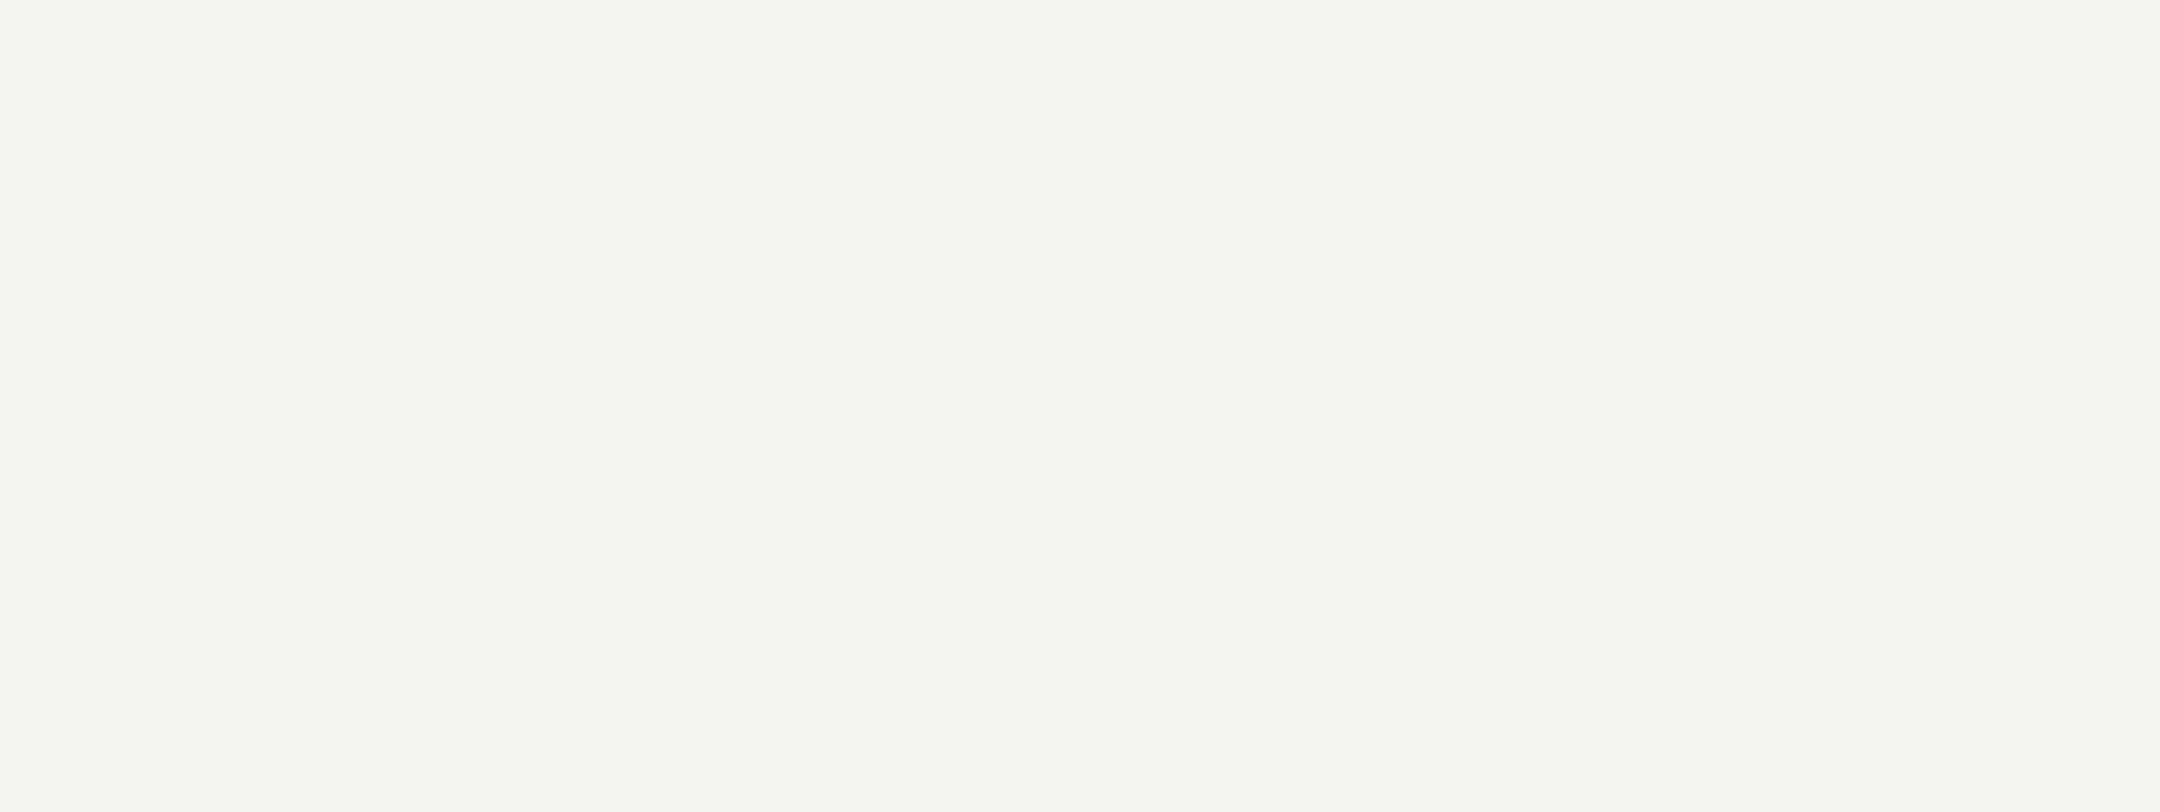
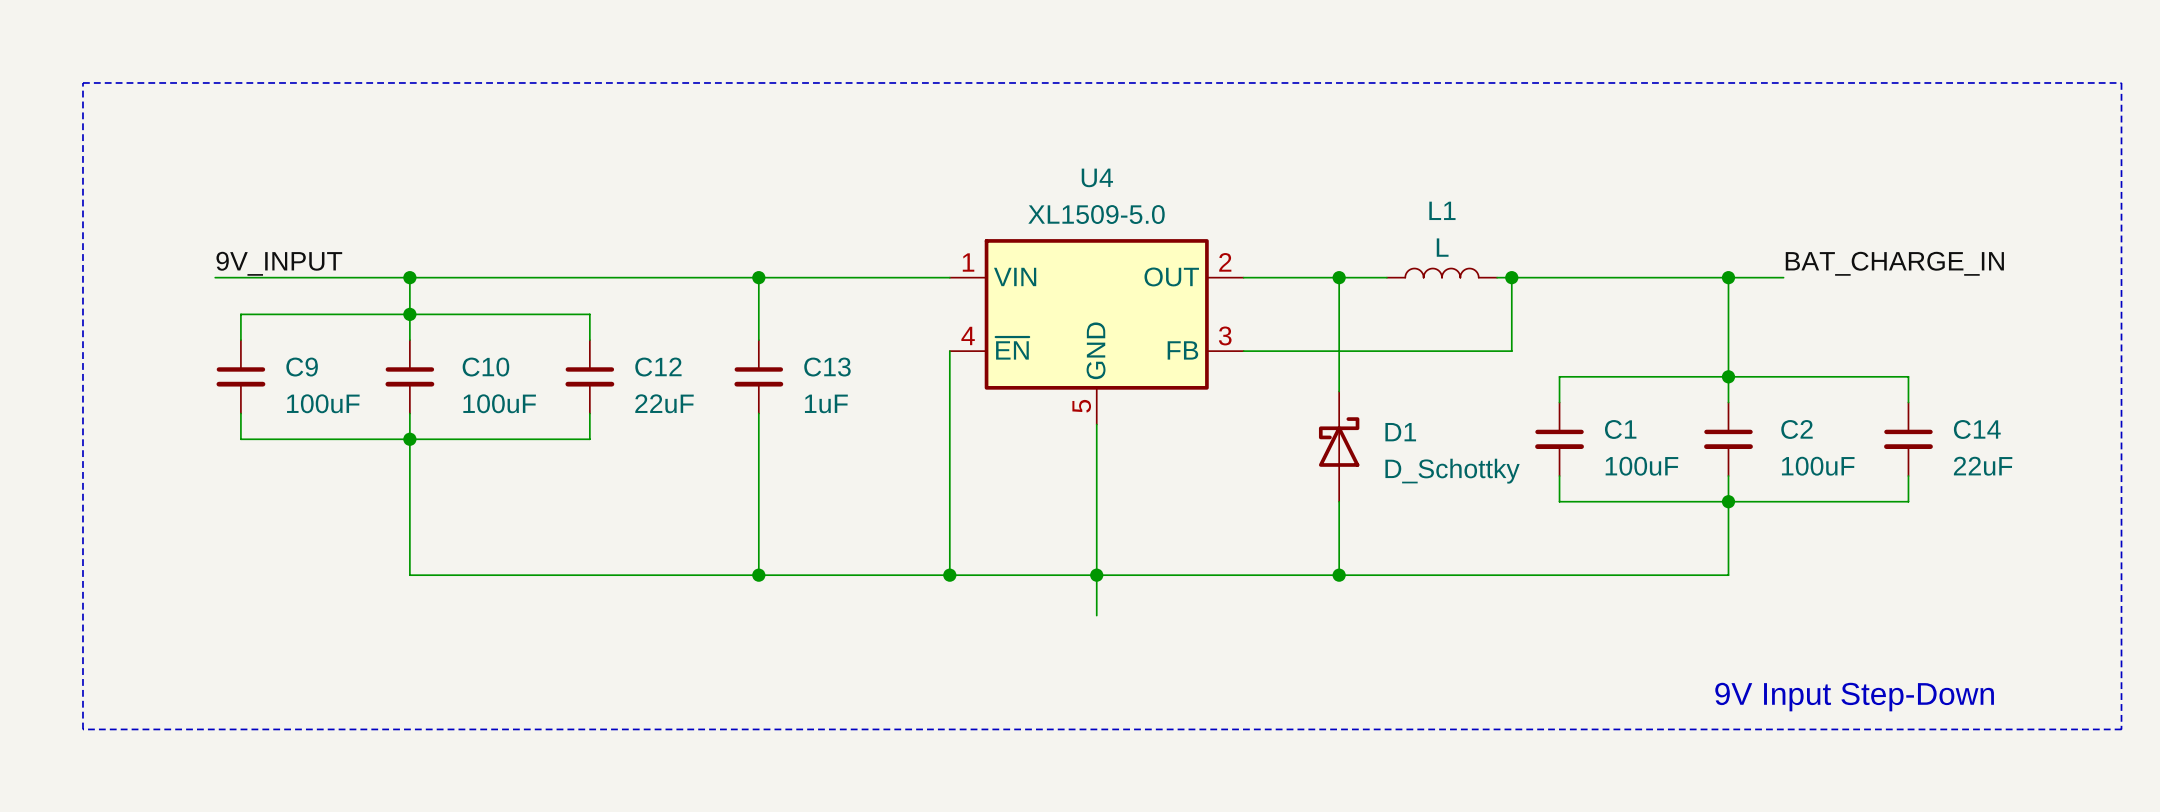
line: none -> (82, 82) (2121, 82) (2121, 729) (82, 729) (82, 82)
label: none -> 9V_INPUT (279, 263)
label: none -> BAT_CHARGE_IN (1894, 263)
L1: none -> L (1442, 273)
wire: none -> (215, 277) (949, 277)
wire: none -> (409, 277) (409, 340)
junction: none -> (409, 277)
wire: none -> (758, 277) (758, 340)
junction: none -> (758, 277)
wire: none -> (1243, 277) (1386, 277)
wire: none -> (1339, 277) (1339, 391)
junction: none -> (1339, 277)
wire: none -> (1497, 277) (1783, 277)
wire: none -> (1511, 277) (1511, 351) (1243, 351)
junction: none -> (1511, 277)
wire: none -> (1728, 277) (1728, 402)
junction: none -> (1728, 277)
junction: none -> (409, 314)
U4: none -> XL1509-5.0 (1096, 331)
wire: none -> (240, 340) (240, 314) (589, 314) (589, 340)
wire: none -> (949, 351) (949, 575)
C9: none -> 100uF (240, 376)
C10: none -> 100uF (409, 376)
C12: none -> 22uF (589, 376)
C13: none -> 1uF (758, 376)
junction: none -> (1728, 376)
wire: none -> (1559, 402) (1559, 376) (1908, 376) (1908, 402)
wire: none -> (240, 413) (240, 439) (589, 439) (589, 413)
wire: none -> (409, 413) (409, 575) (1728, 575) (1728, 476)
wire: none -> (758, 413) (758, 575)
wire: none -> (1096, 424) (1096, 615)
junction: none -> (409, 439)
C1: none -> 100uF (1559, 439)
C2: none -> 100uF (1728, 439)
C14: none -> 22uF (1908, 439)
D1: none -> D_Schottky (1339, 446)
wire: none -> (1559, 476) (1559, 501) (1908, 501) (1908, 476)
wire: none -> (1339, 501) (1339, 575)
junction: none -> (1728, 501)
junction: none -> (758, 575)
junction: none -> (949, 575)
junction: none -> (1096, 575)
junction: none -> (1339, 575)
text: none -> 9V Input Step-Down (1854, 697)

